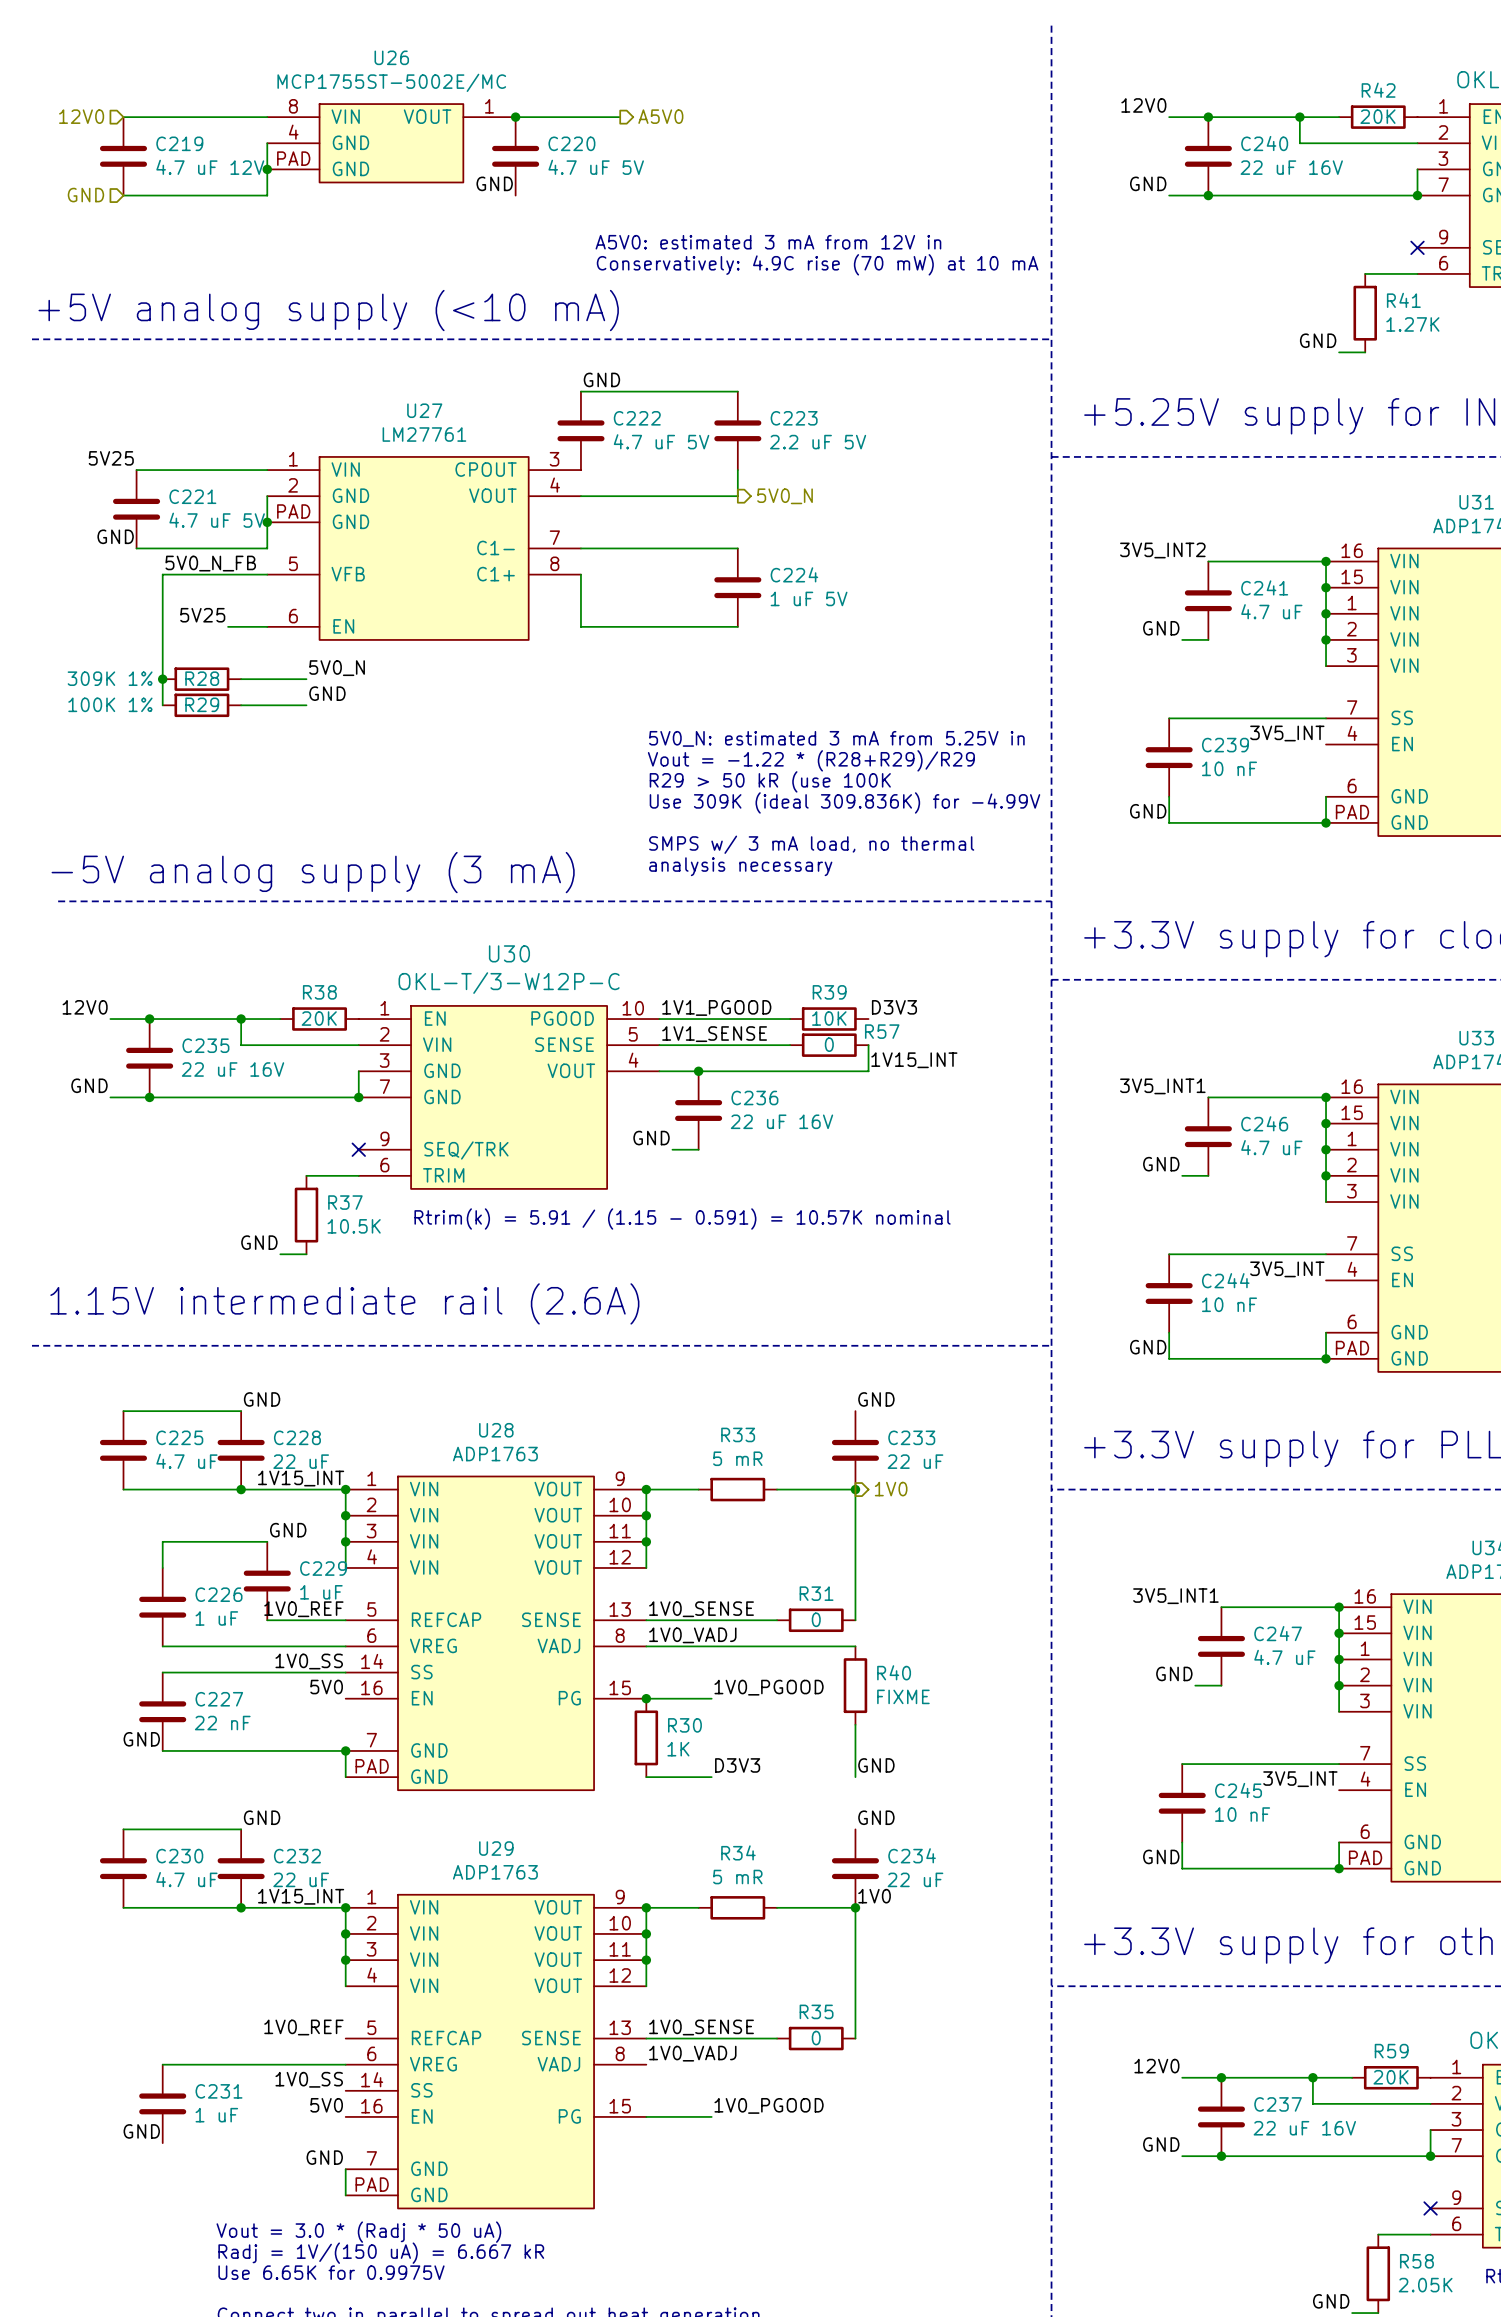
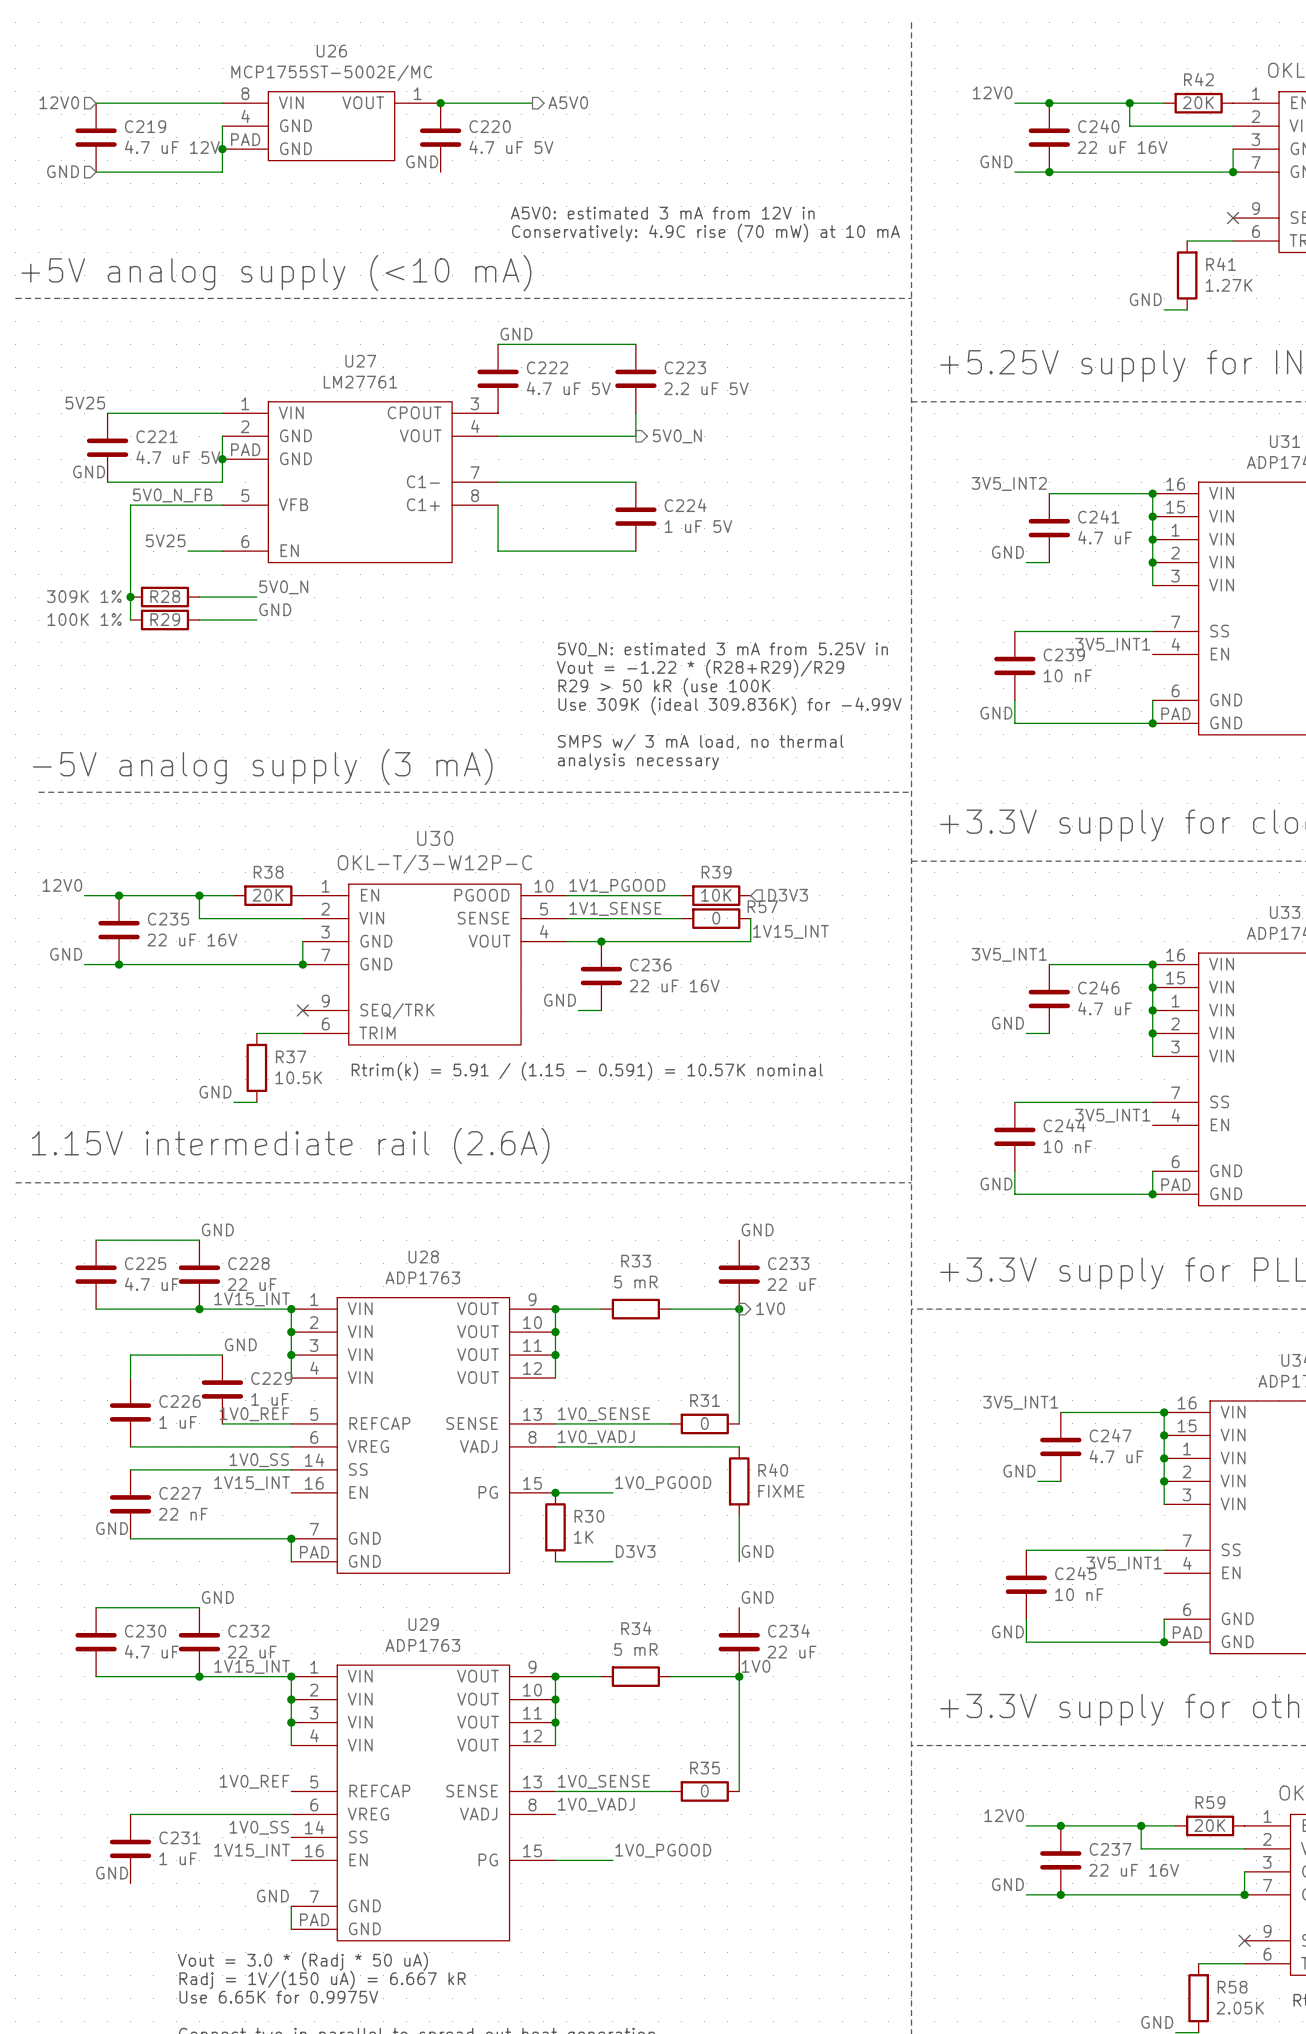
label: 3V5_INT (1287, 733) -> 3V5_INT1 (1112, 644)
label: D3V3 (894, 1007) -> none
hierarchical label: none -> D3V3 (788, 895)
label: 3V5_INT (1287, 1269) -> 3V5_INT1 (1112, 1115)
label: 5V0 (326, 1687) -> 1V15_INT (252, 1483)
label: 3V5_INT (1300, 1779) -> 3V5_INT1 (1124, 1563)
label: 5V0 (326, 2105) -> 1V15_INT (252, 1850)

